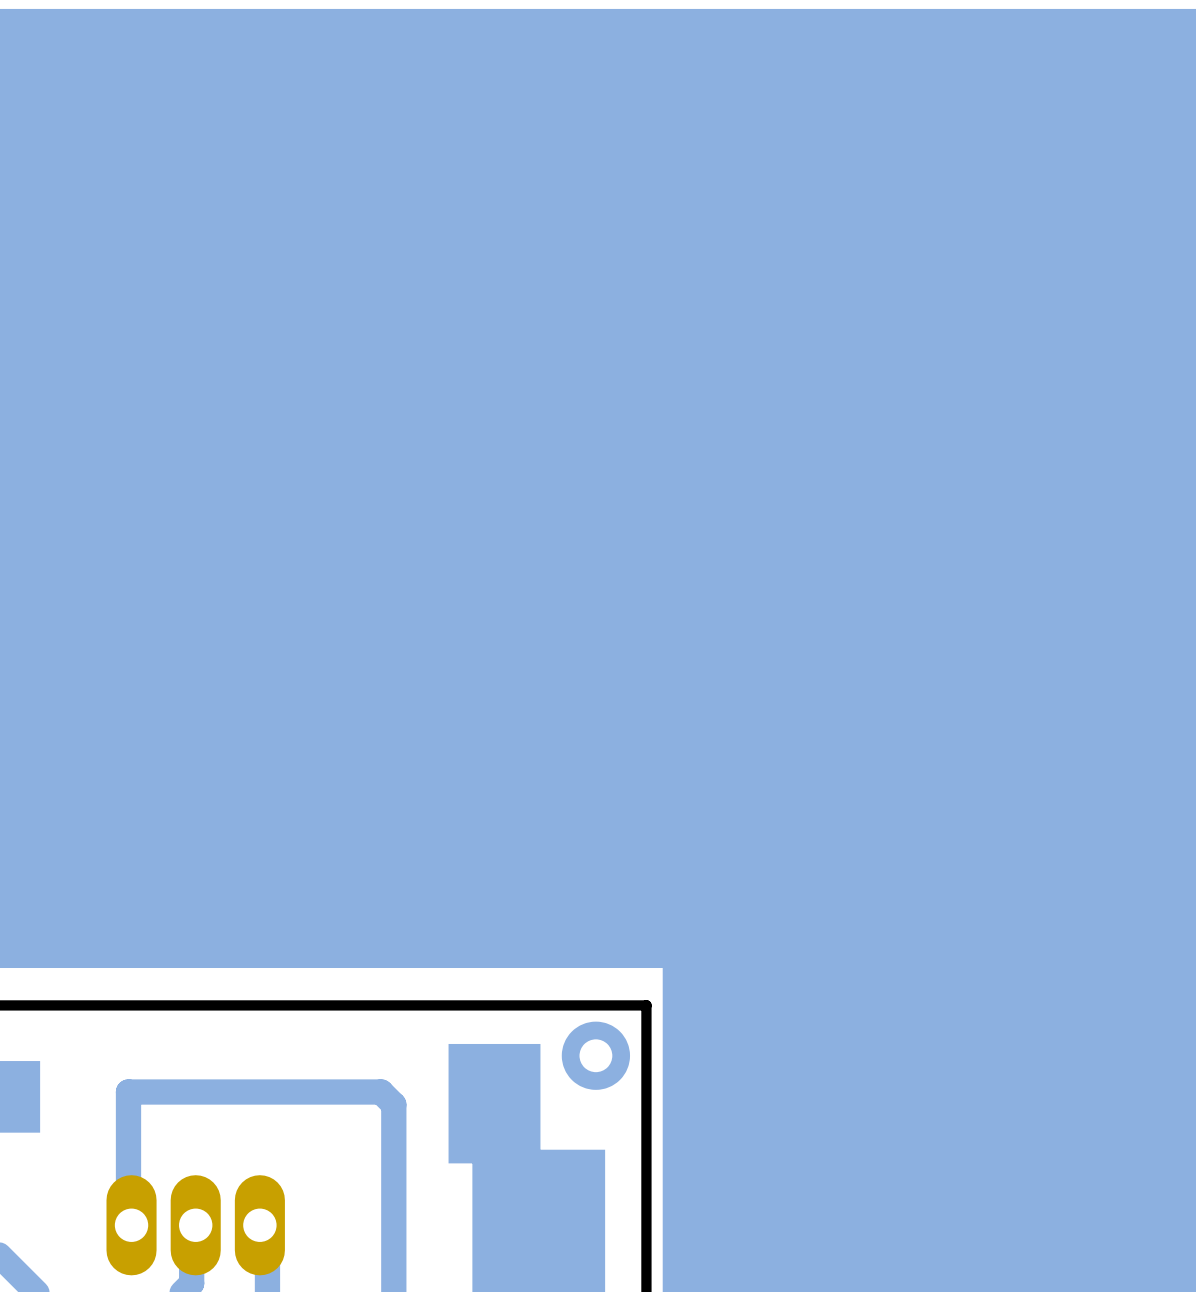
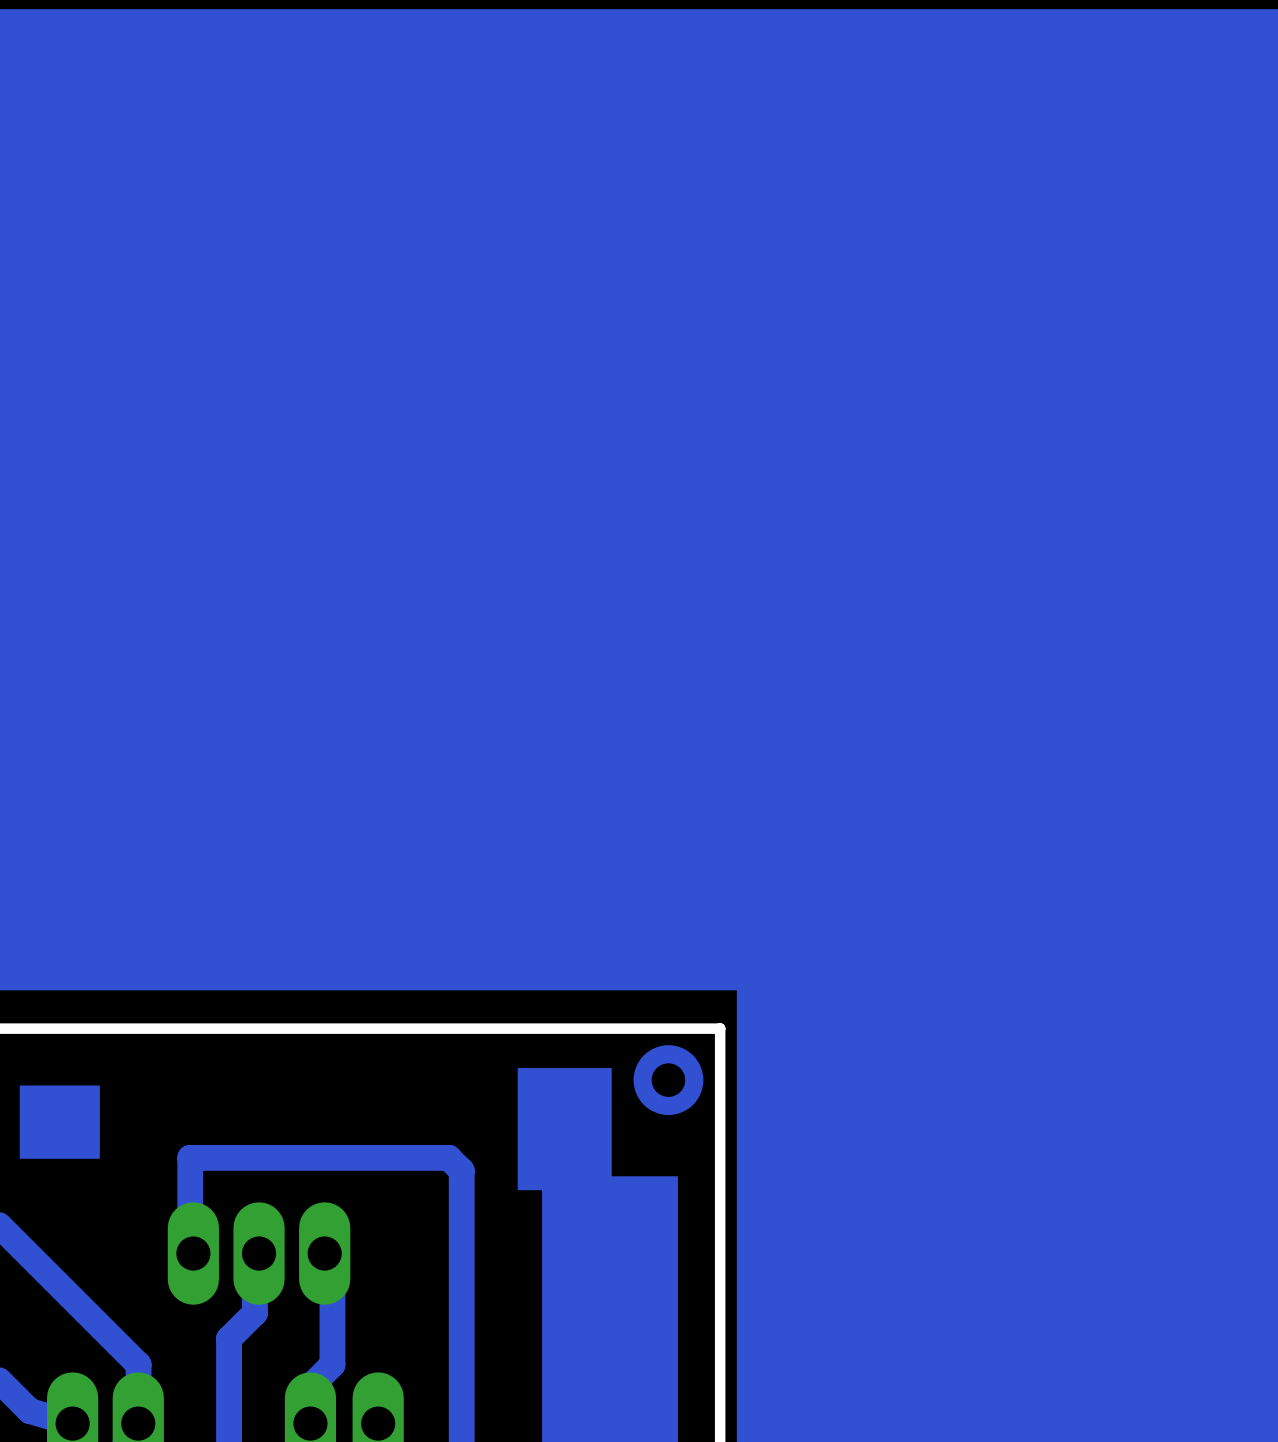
bottom track: (128, 1131) (128, 1092) (381, 1092) (393, 1104) (393, 1144) -> (190, 1157) (448, 1157) (461, 1170)

